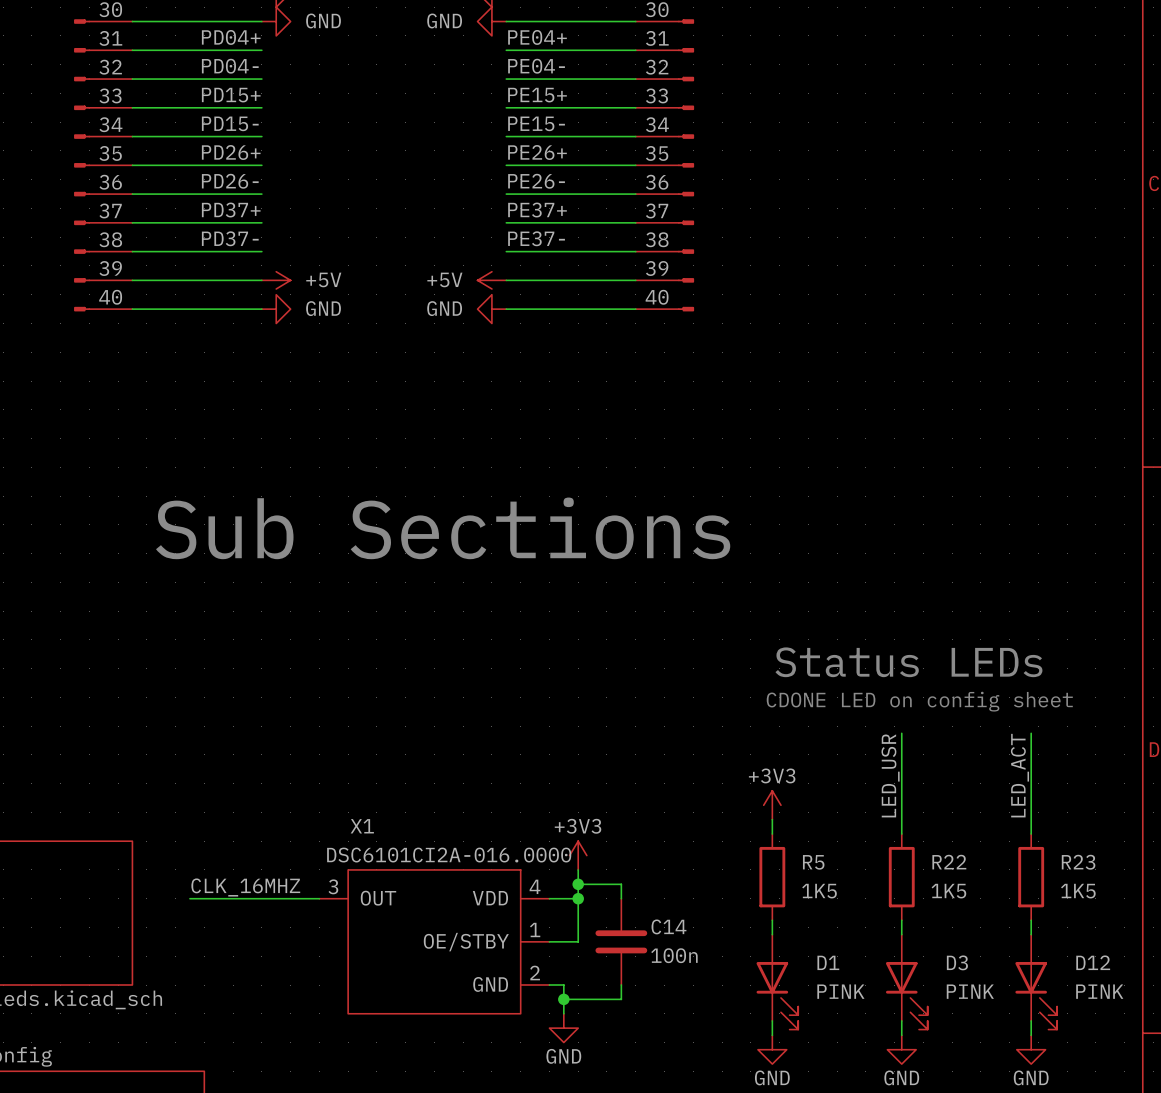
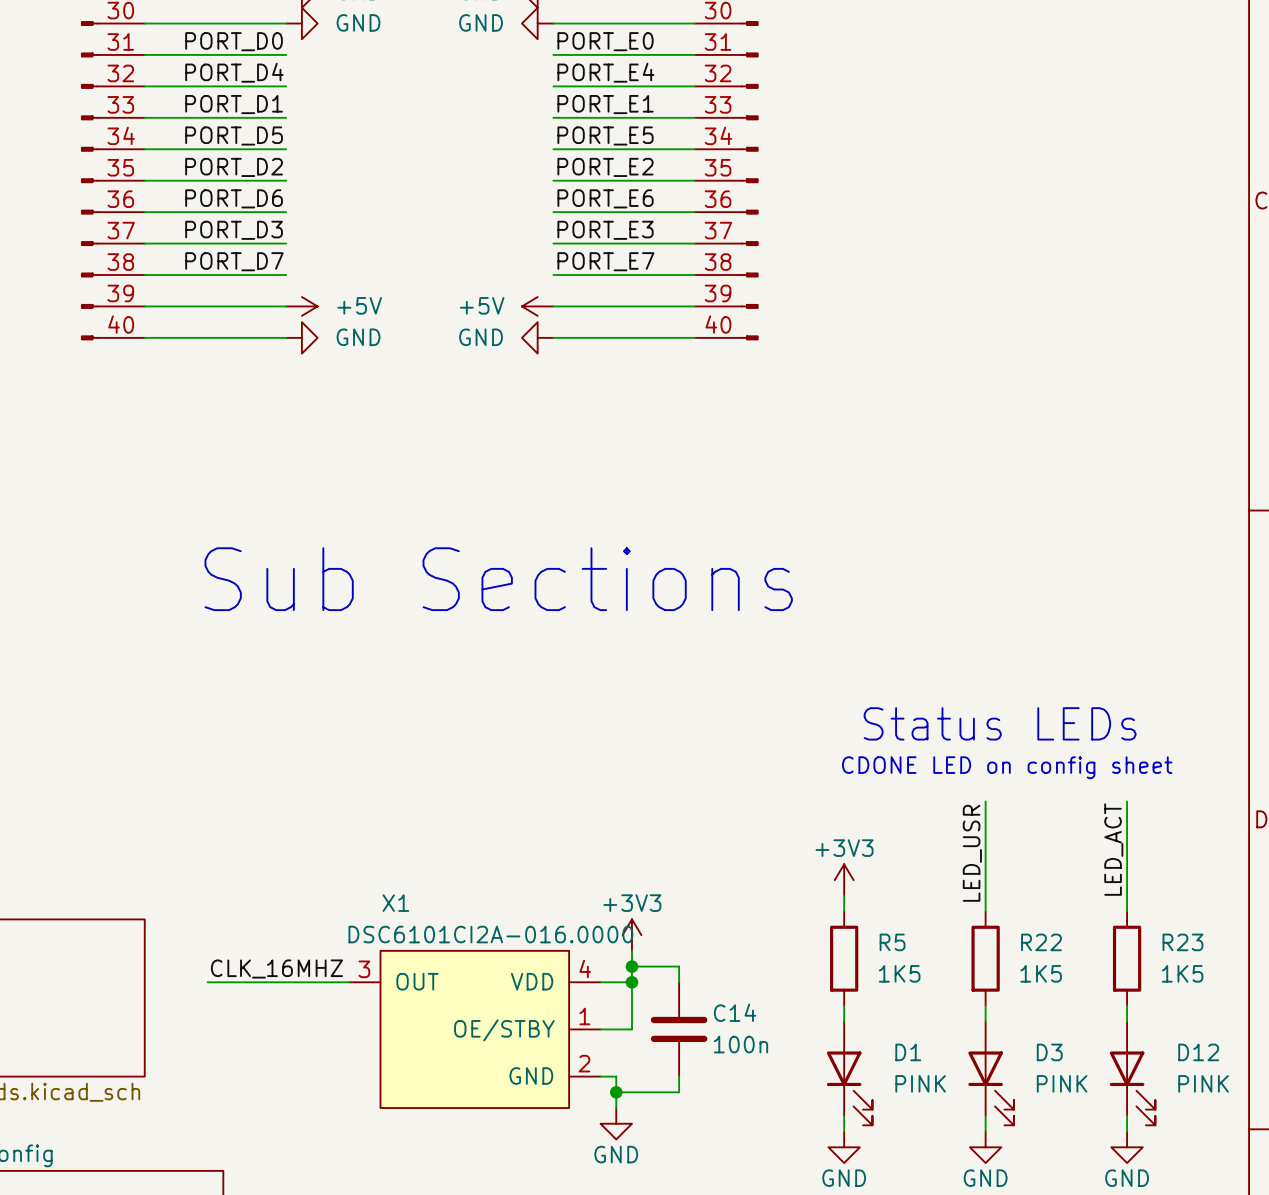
label: PD04+ (231, 37) -> PORT_D0 (234, 41)
label: PE04+ (537, 37) -> PORT_E0 (605, 41)
label: PD04- (230, 66) -> PORT_D4 (234, 72)
label: PE04- (536, 66) -> PORT_E4 (605, 72)
label: PD15+ (231, 95) -> PORT_D1 (234, 104)
label: PE15+ (537, 95) -> PORT_E1 (605, 104)
label: PD15- (230, 123) -> PORT_D5 (234, 135)
label: PE15- (536, 123) -> PORT_E5 (605, 135)
label: PD26+ (231, 152) -> PORT_D2 (234, 167)
label: PE26+ (537, 152) -> PORT_E2 (605, 167)
label: PD26- (230, 181) -> PORT_D6 (234, 198)
label: PE26- (536, 181) -> PORT_E6 (605, 198)
label: PD37+ (231, 210) -> PORT_D3 (234, 230)
label: PE37+ (537, 210) -> PORT_E3 (605, 230)
label: PD37- (230, 238) -> PORT_D7 (234, 261)
label: PE37- (536, 238) -> PORT_E7 (605, 261)

